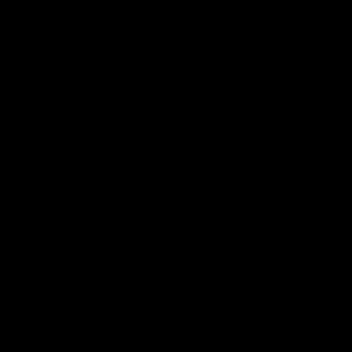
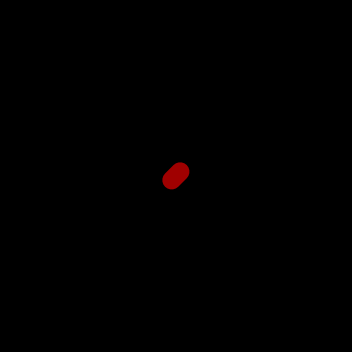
top track: none -> (180, 171) (171, 180)

